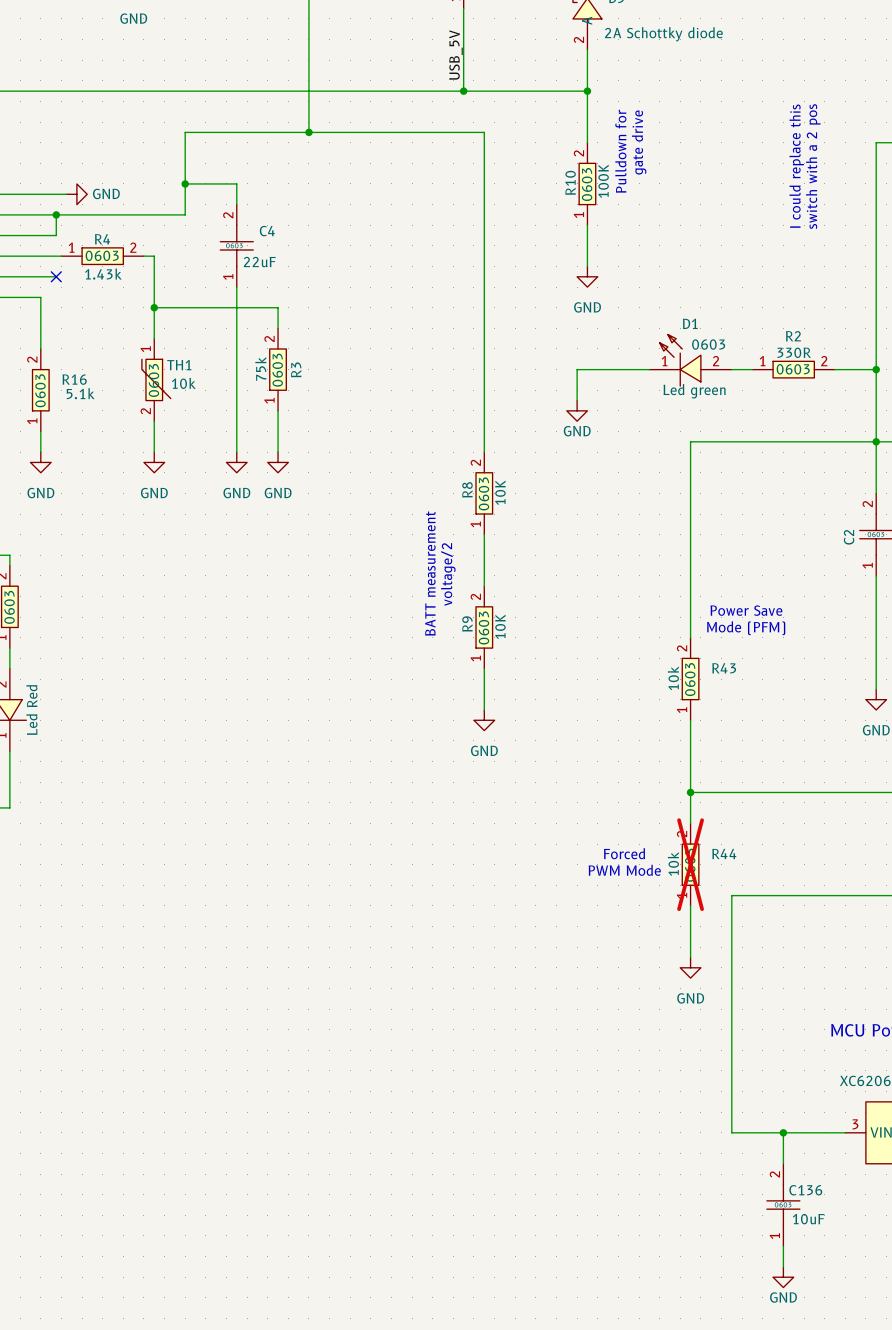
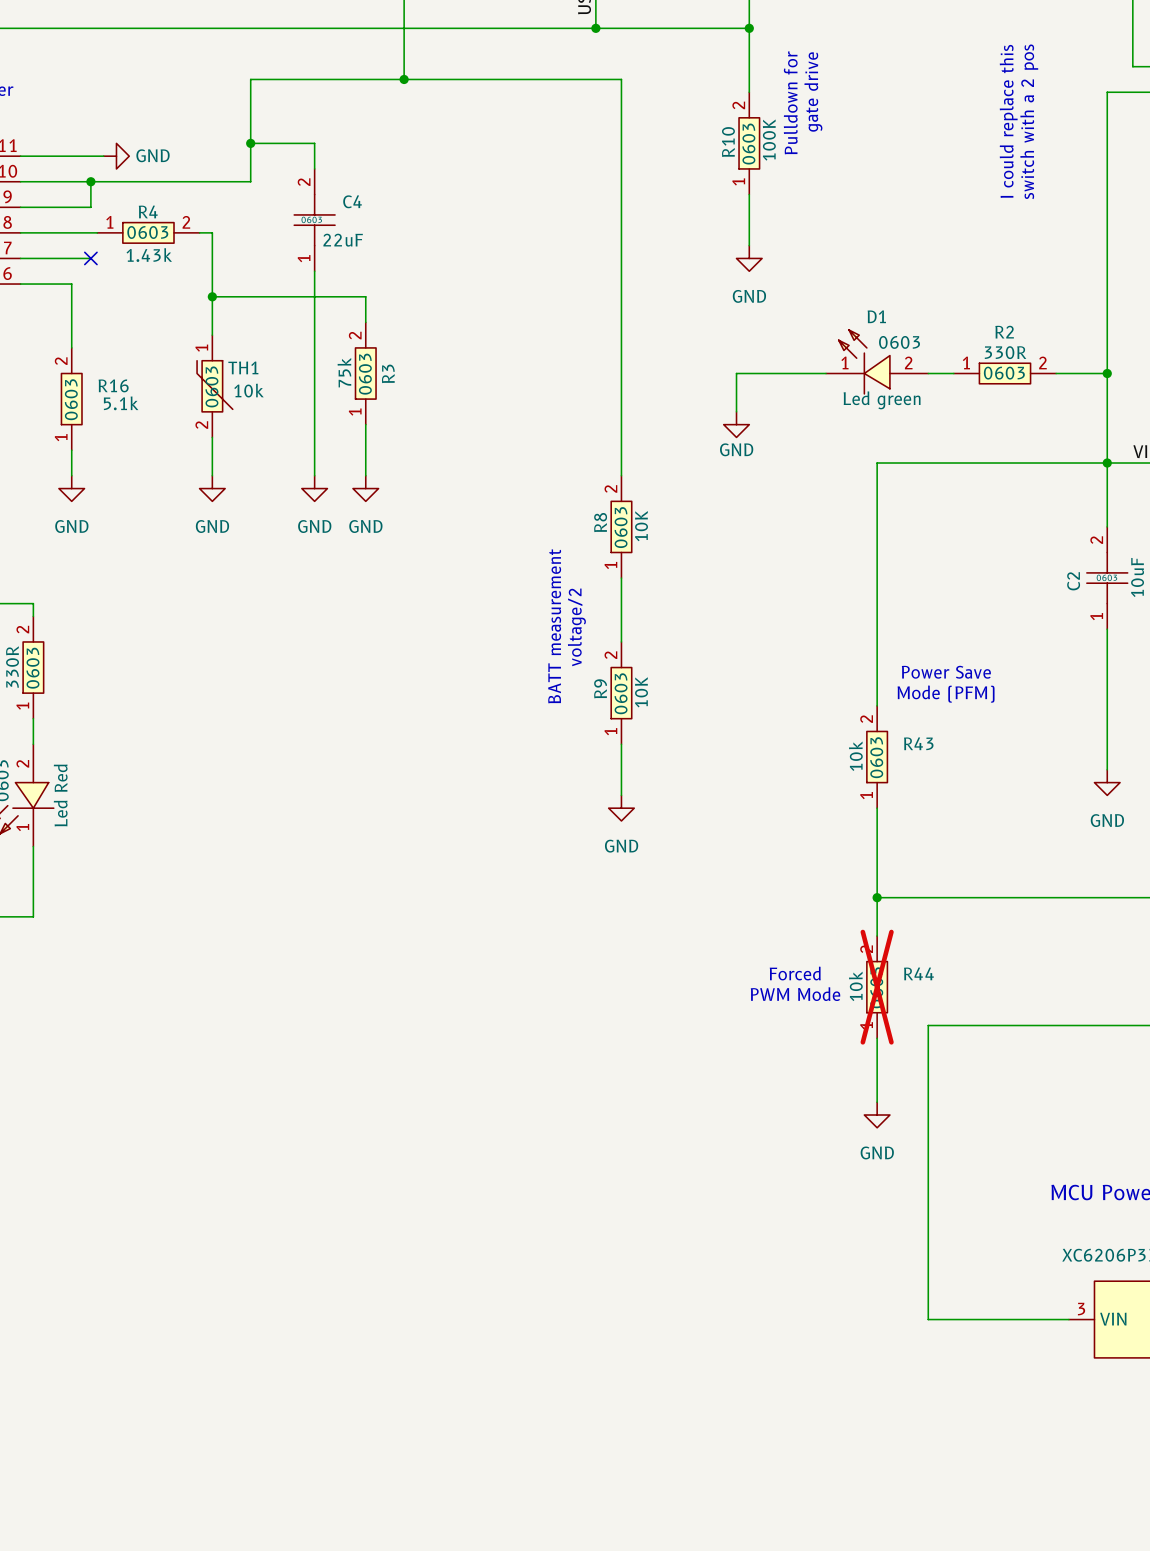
wire: (783, 1132) (783, 1163) -> none
junction: (783, 1132) -> none
C136: (783, 1205) -> none
wire: (783, 1246) (783, 1266) -> none
power symbol: GND (783, 1277) -> none

